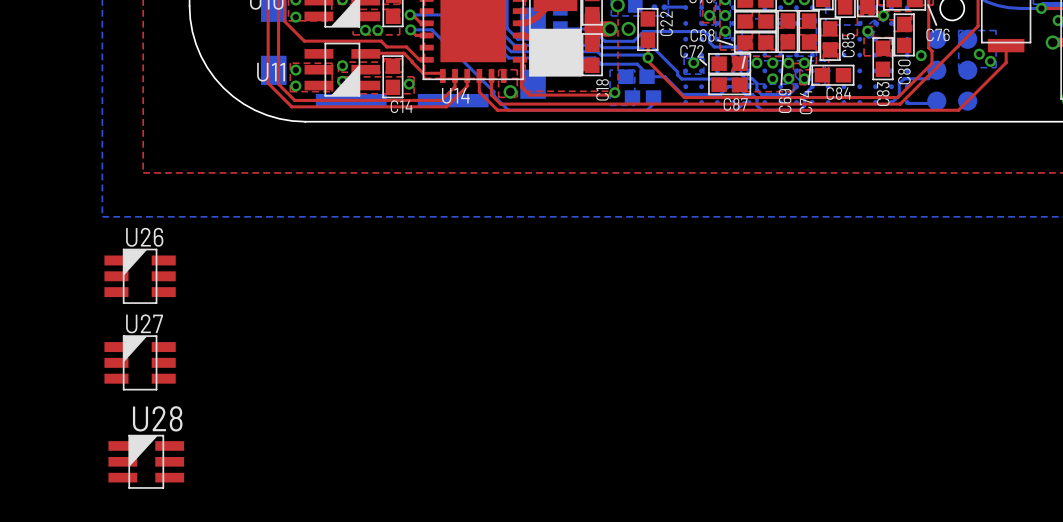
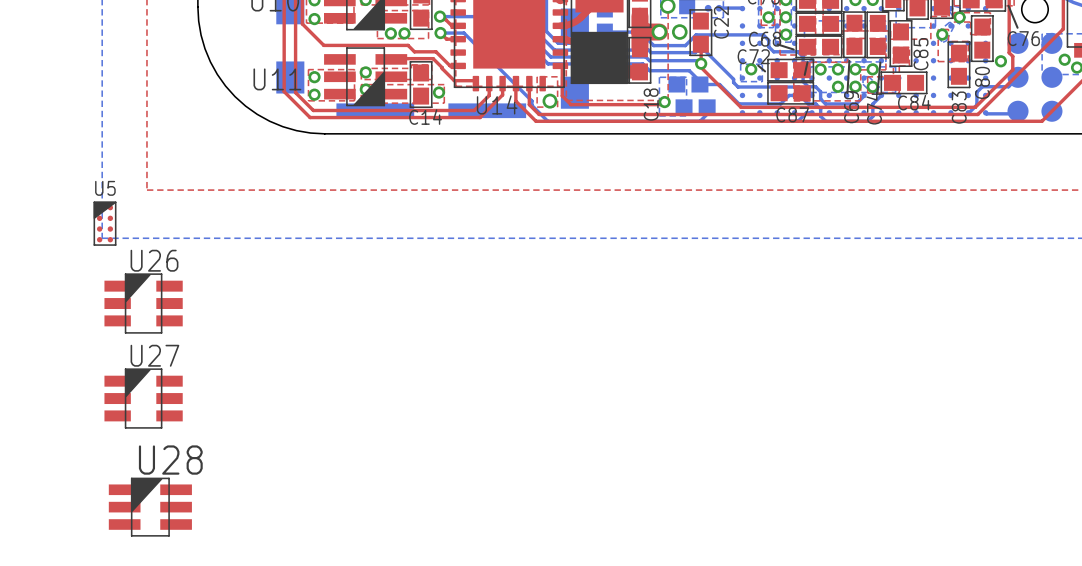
U5: none -> (105, 223)

